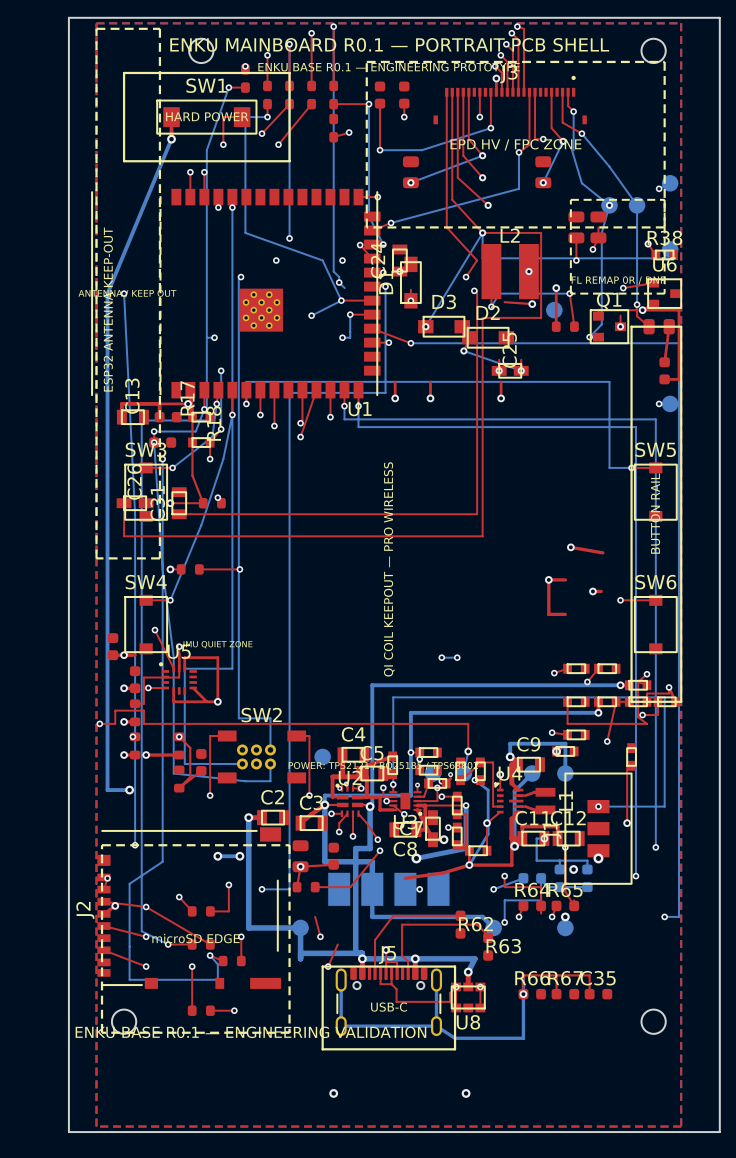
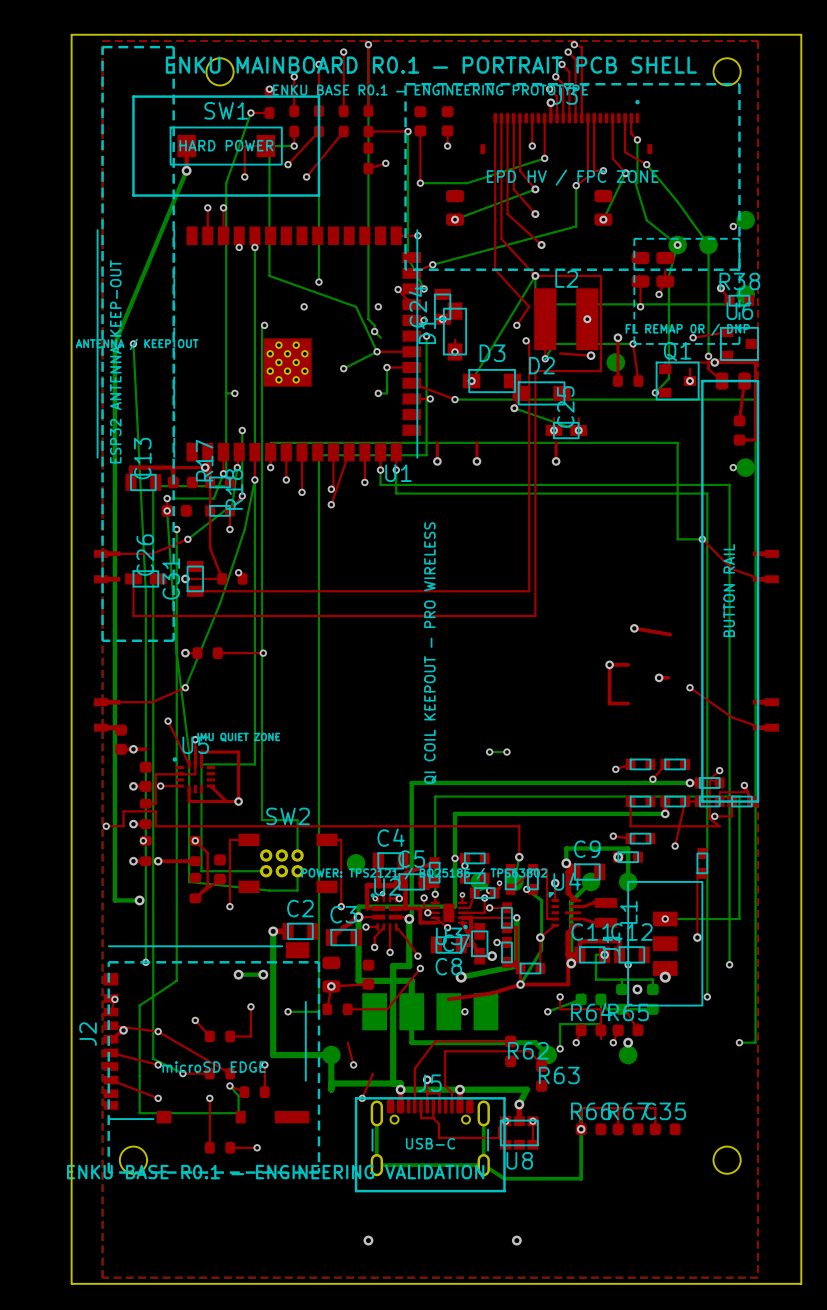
top track: (146, 467) (172, 467) -> (99, 553) (152, 553) (187, 539)
top track: (631, 467) (655, 467) -> (702, 539) (732, 569) (761, 579) (773, 579)
part: none -> (107, 566)
SW3: (146, 492) -> none
SW5: (655, 492) -> none
part: none -> (765, 566)
top track: (146, 600) (170, 600) -> (99, 702) (152, 702) (185, 687)
top track: (620, 600) (655, 600) -> (689, 687) (732, 717) (761, 727) (773, 727)
part: none -> (107, 714)
SW4: (146, 624) -> none
SW6: (655, 624) -> none
part: none -> (765, 714)

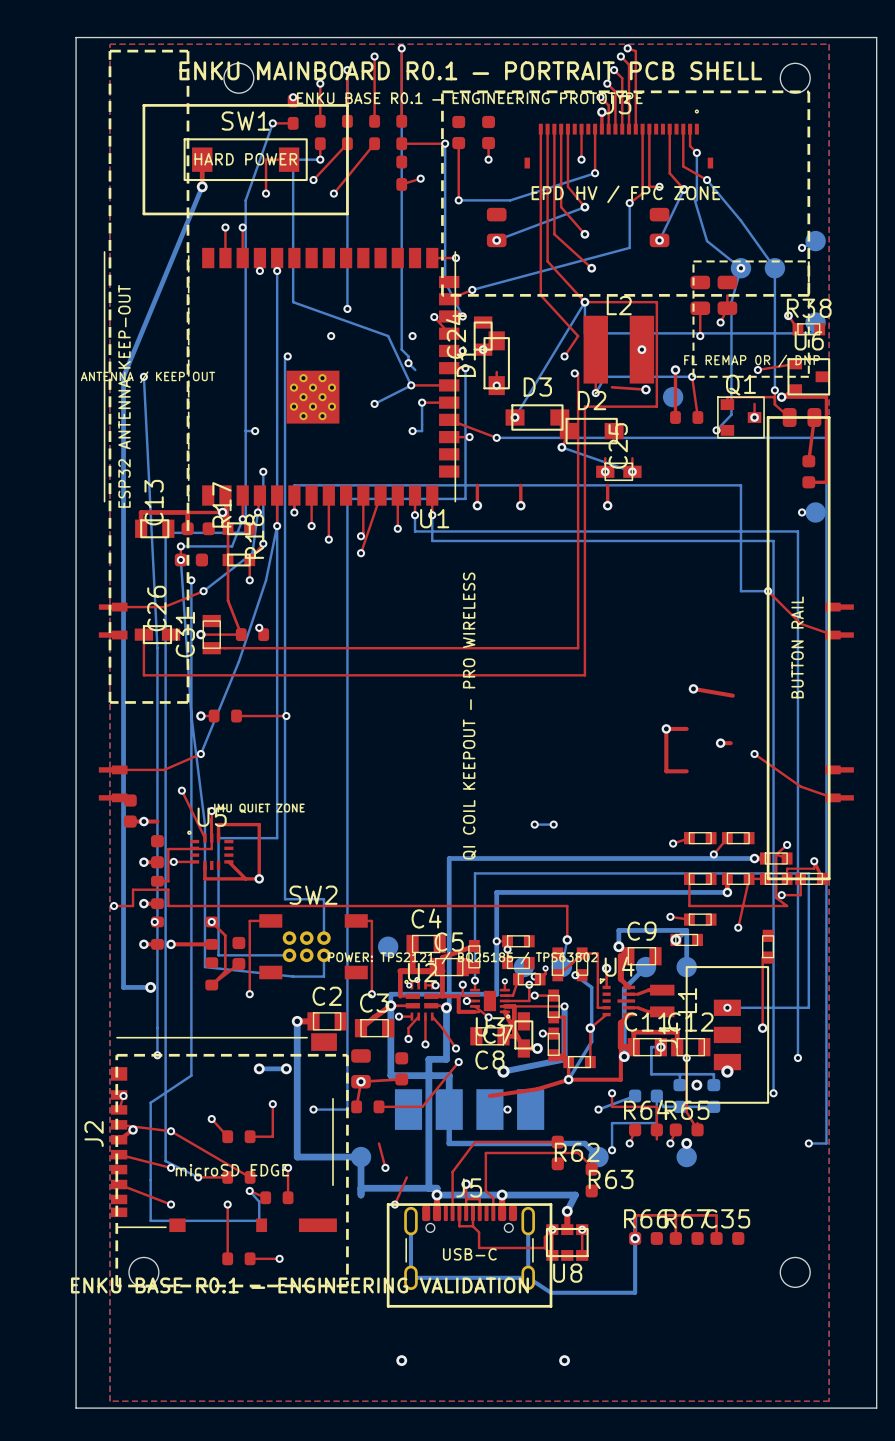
part rotation: 0° (107, 566) -> 180° (113, 621)
part rotation: 0° (765, 566) -> 180° (839, 621)
part rotation: 0° (107, 714) -> 180° (113, 783)
part rotation: 0° (765, 714) -> 180° (839, 783)

